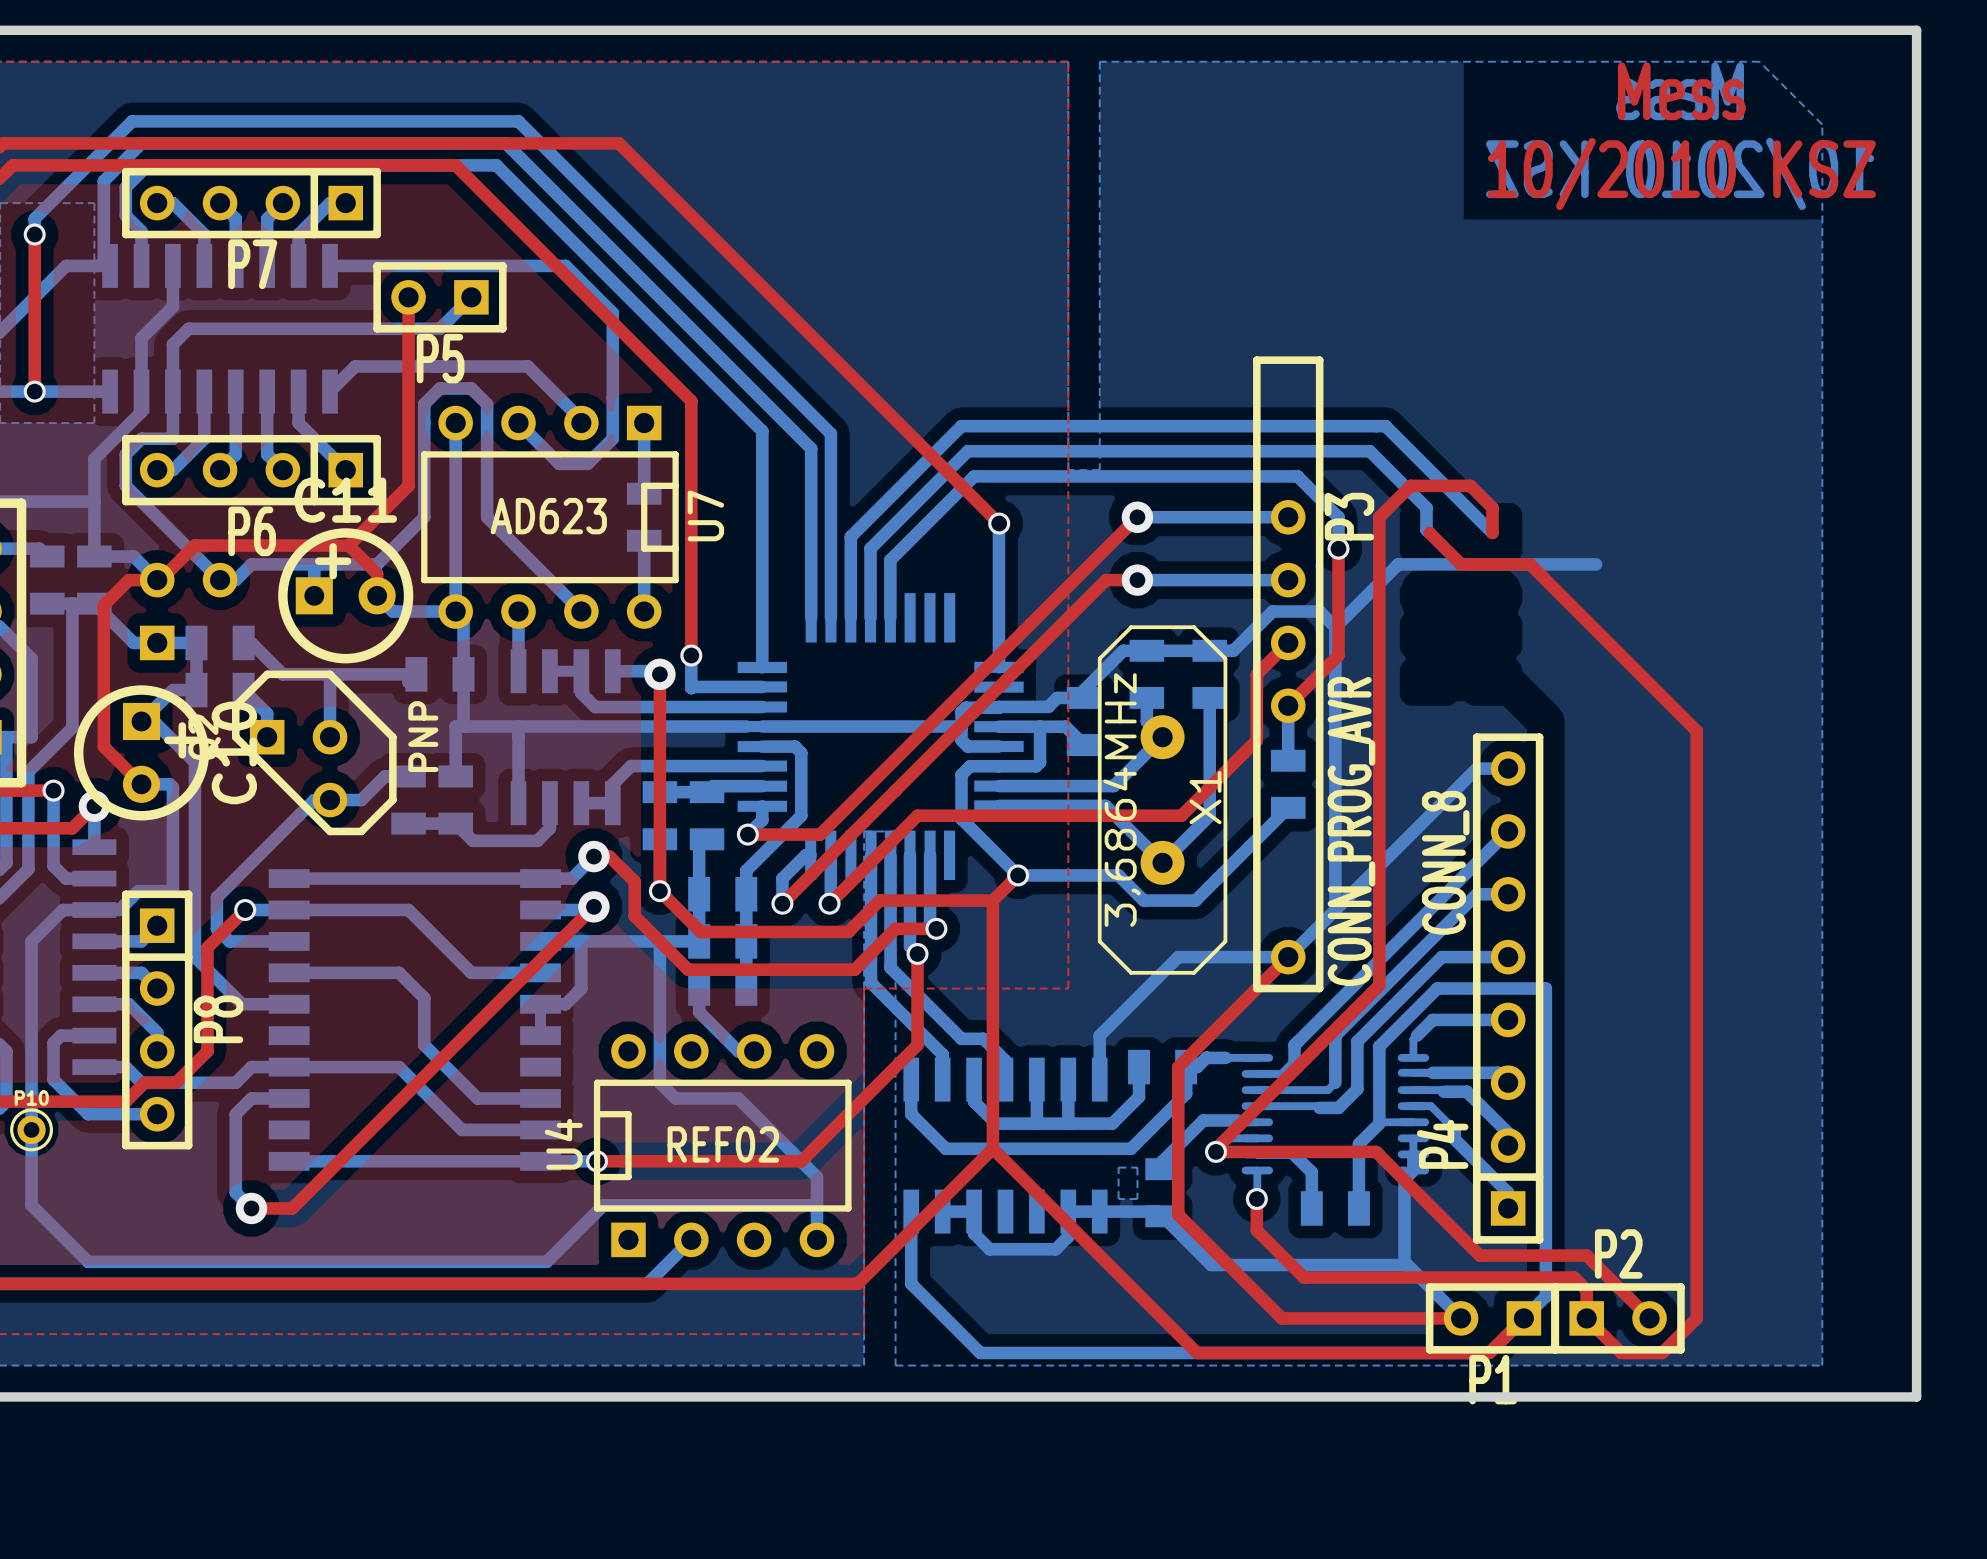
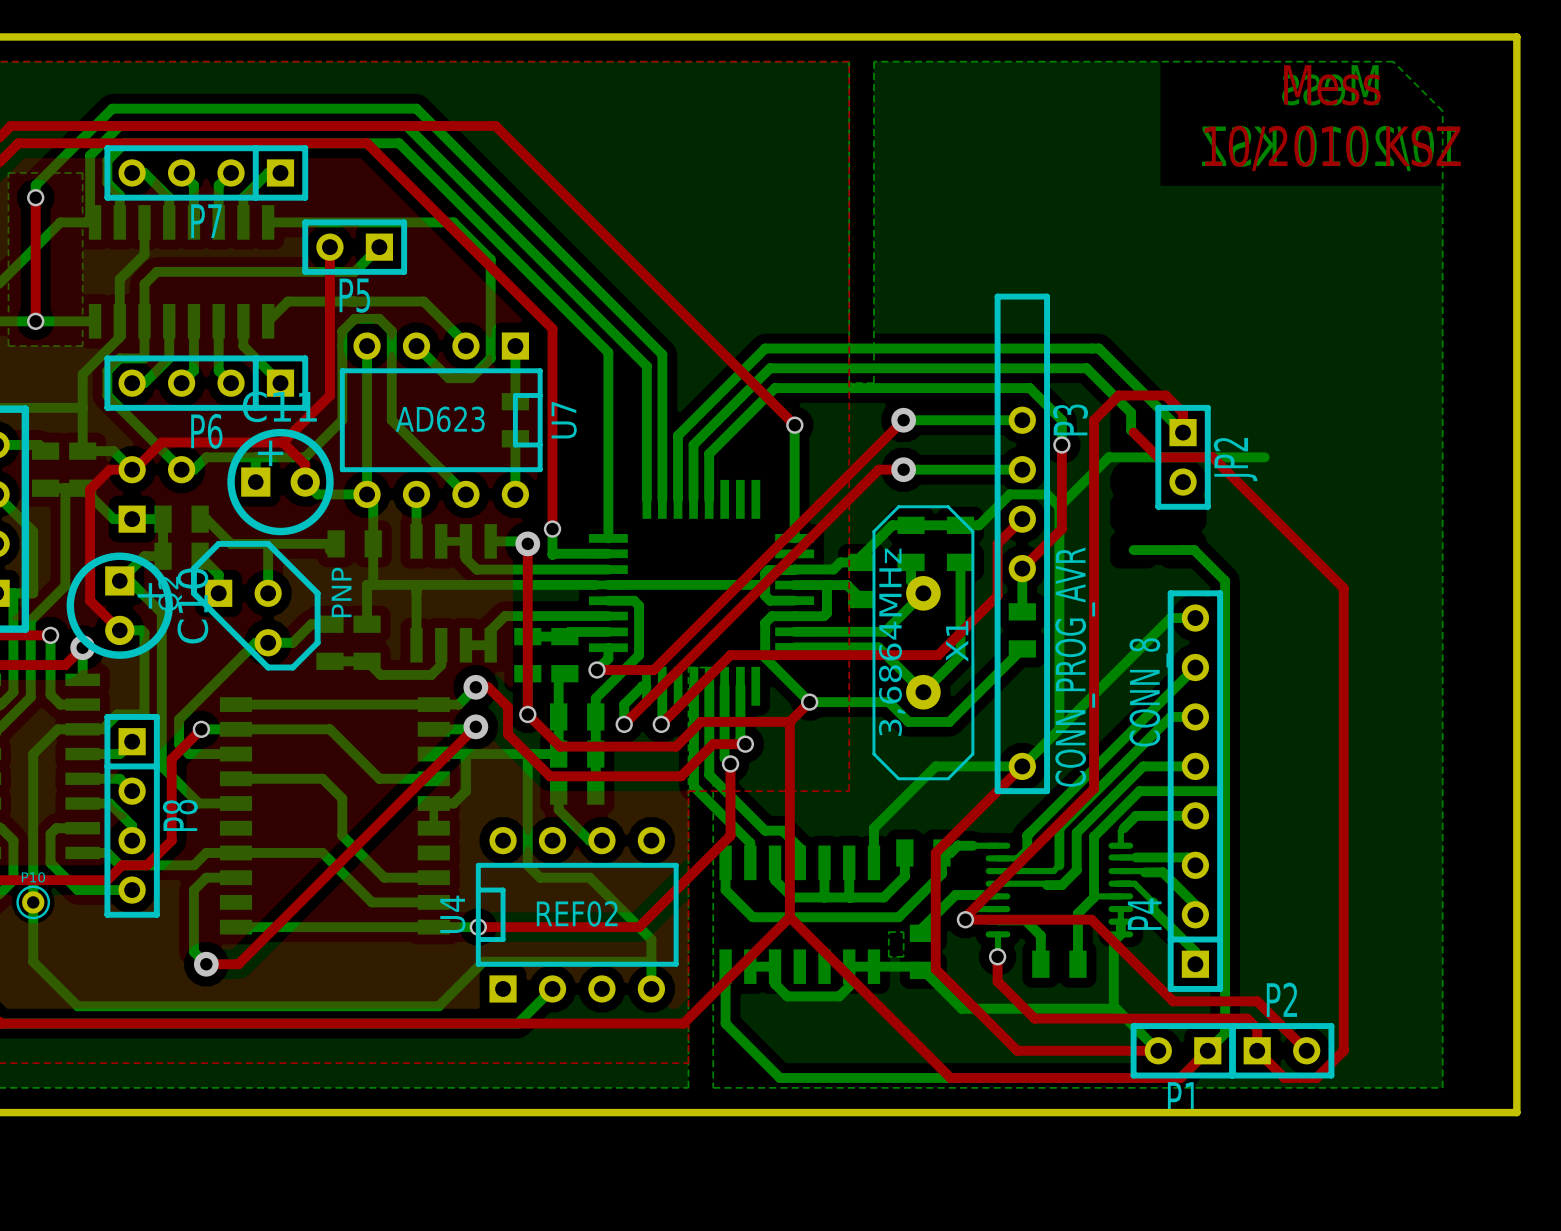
JP2: none -> (1183, 457)
bottom track: none -> (1133, 550) (1194, 550) (1225, 580) (1225, 791)

